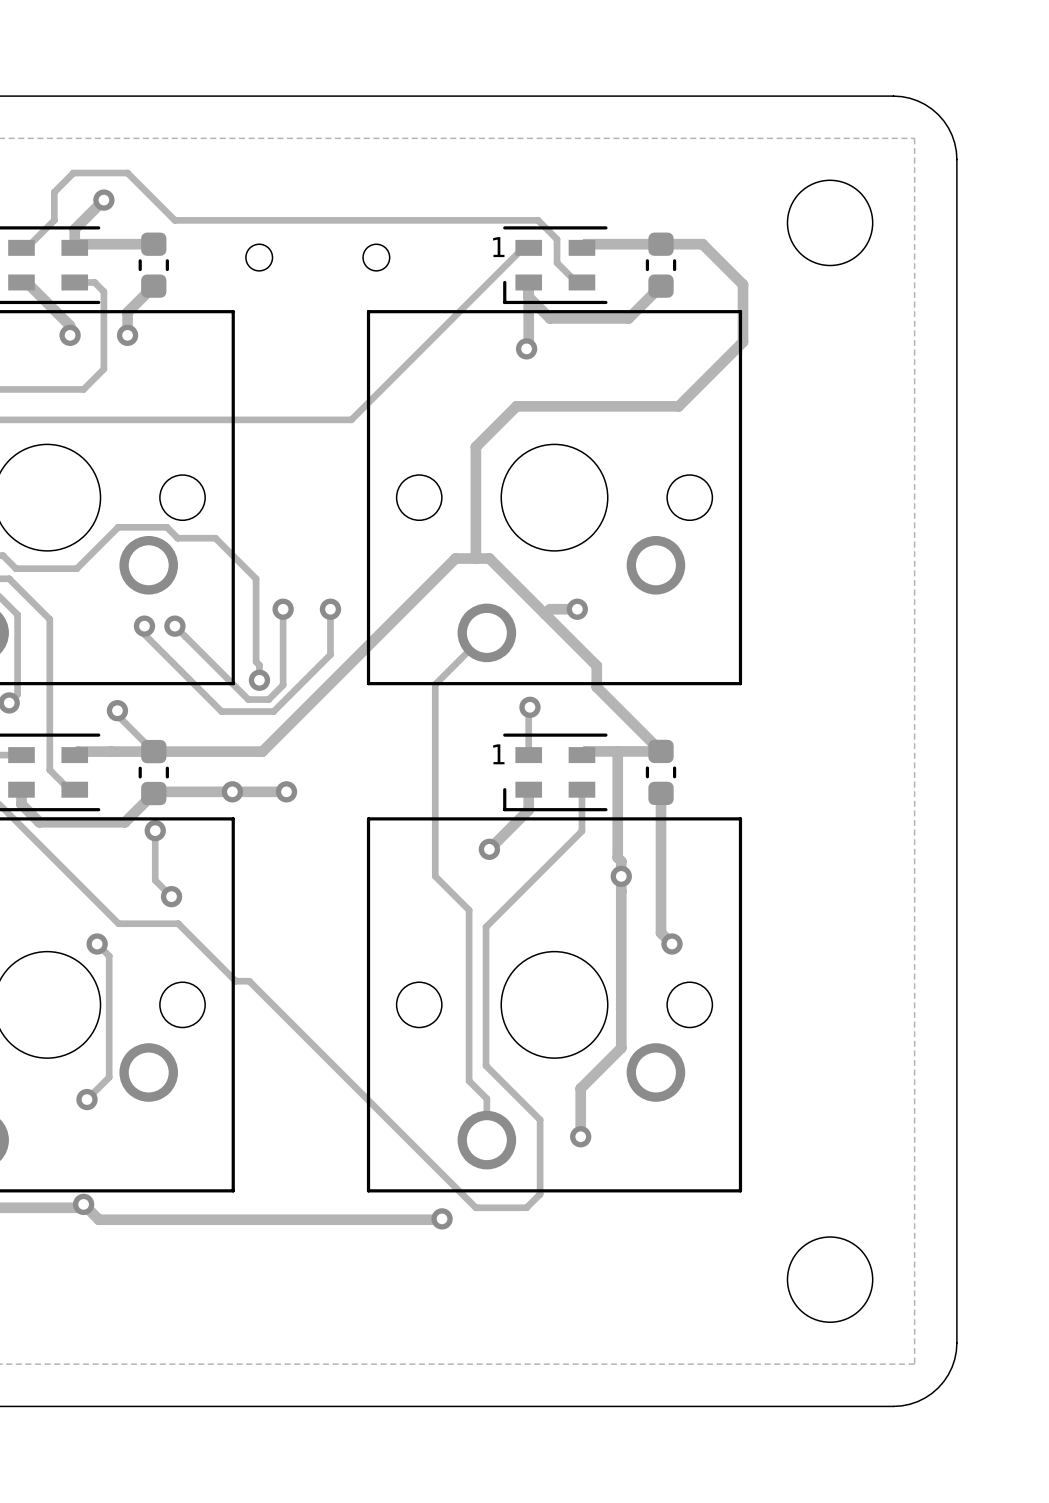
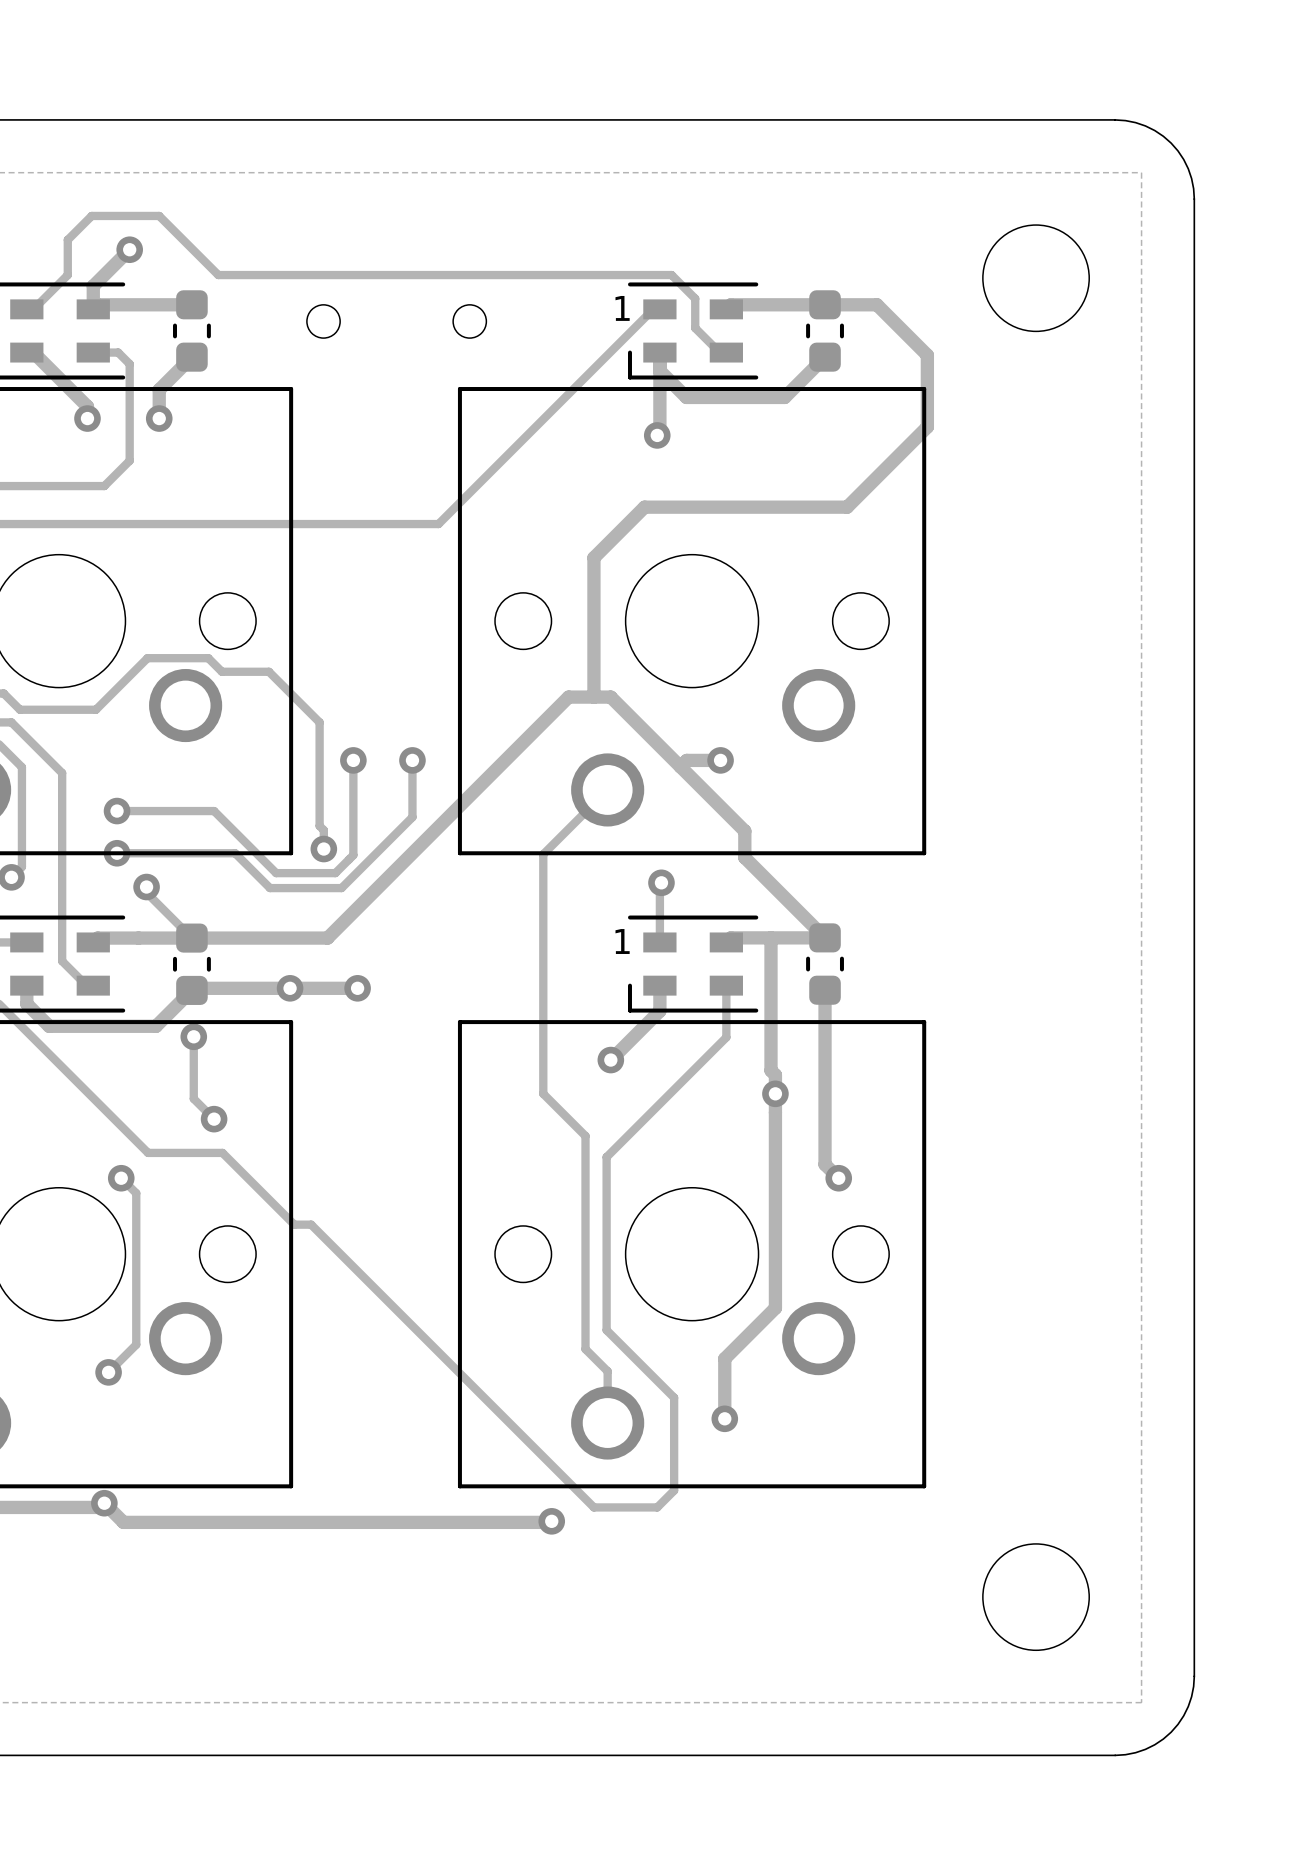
track: (144, 626) (144, 634) (221, 711) -> (117, 853) (235, 853) (269, 888) (276, 888)
via: (144, 626) -> none
track: (174, 626) (248, 699) -> (117, 811) (214, 811) (276, 873) (309, 873)
via: (174, 626) -> none
via: none -> (117, 811)
via: none -> (117, 853)

